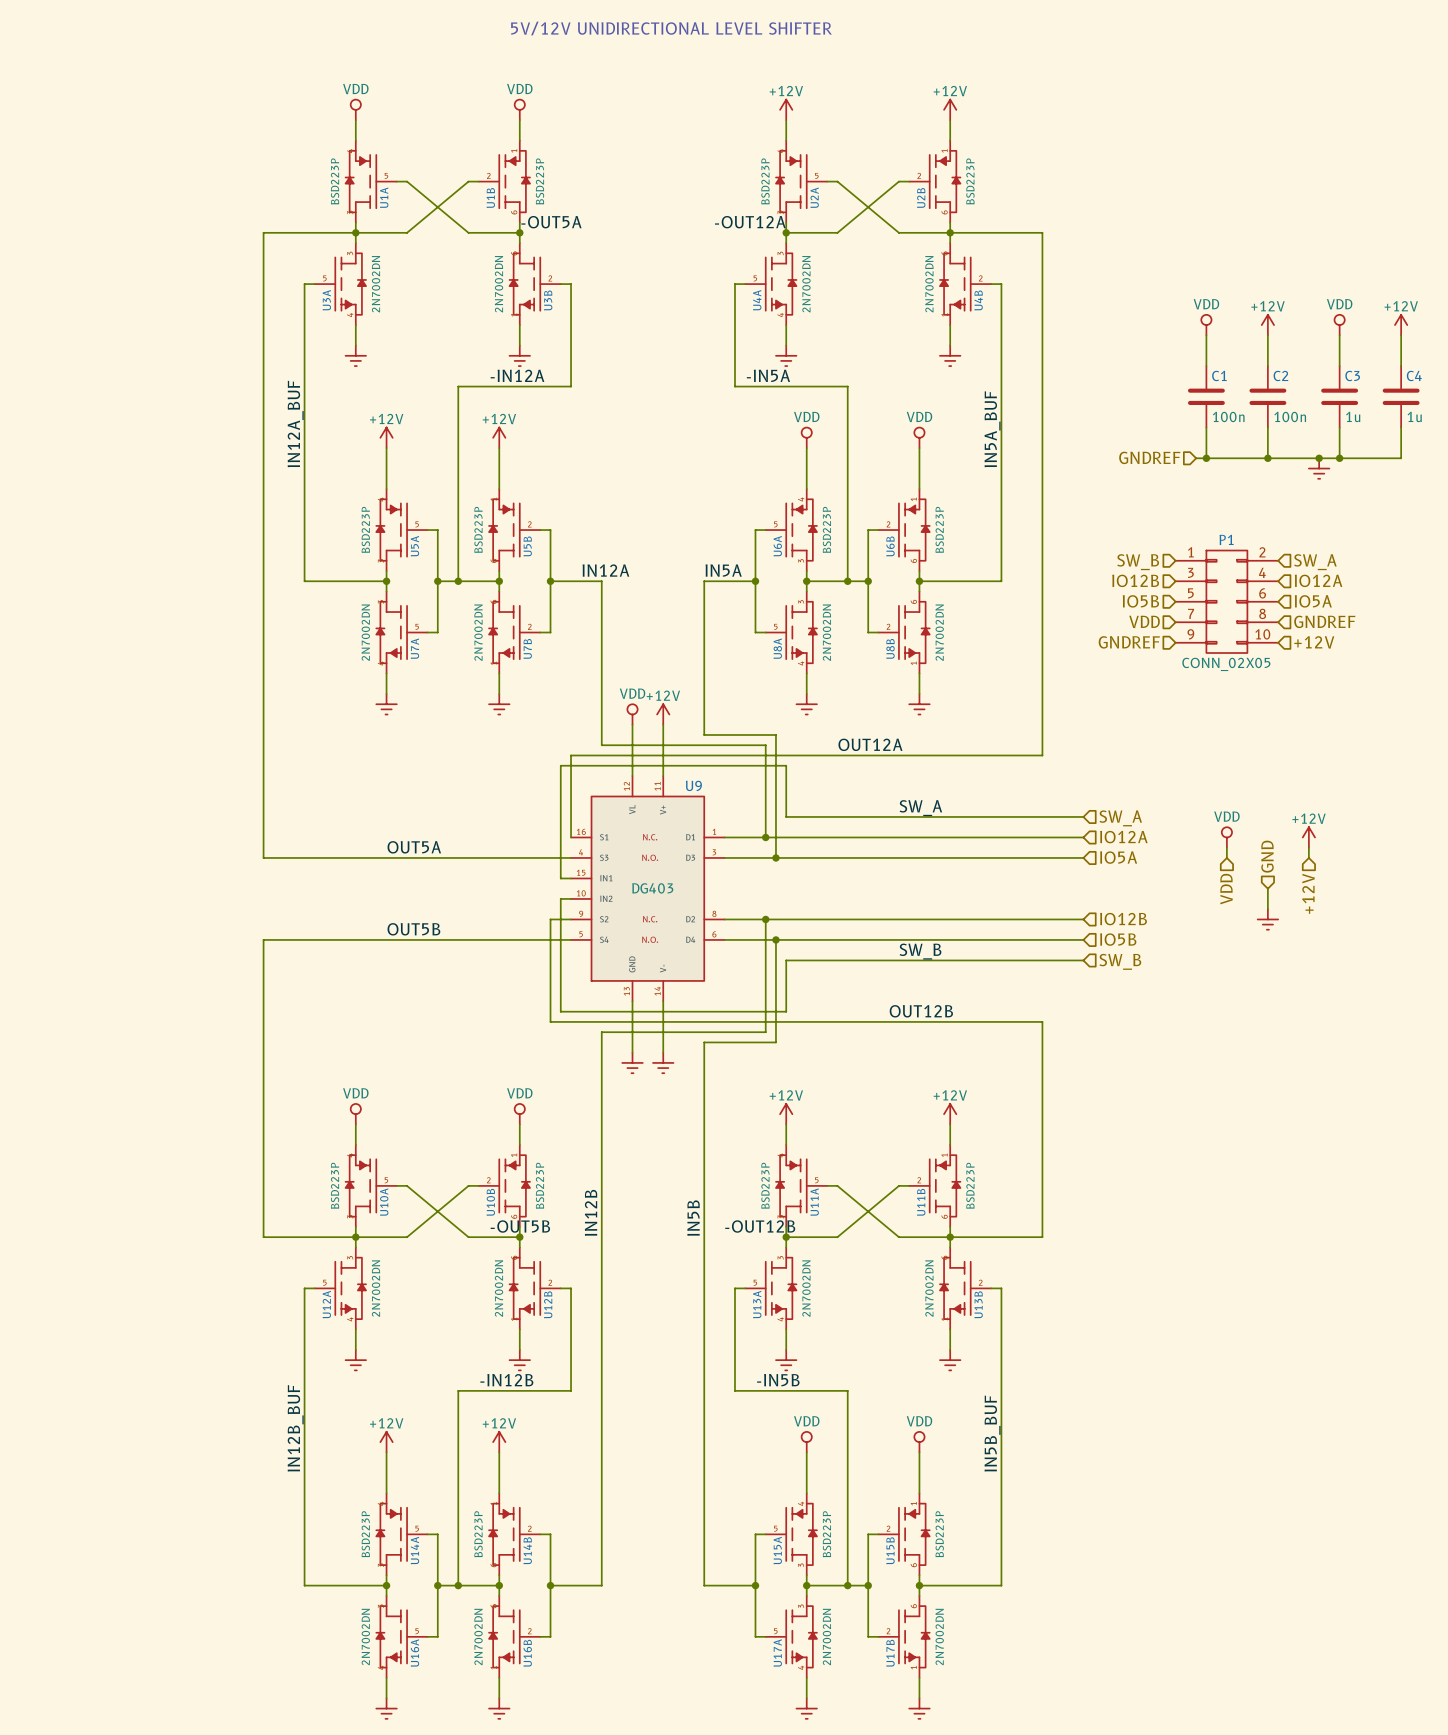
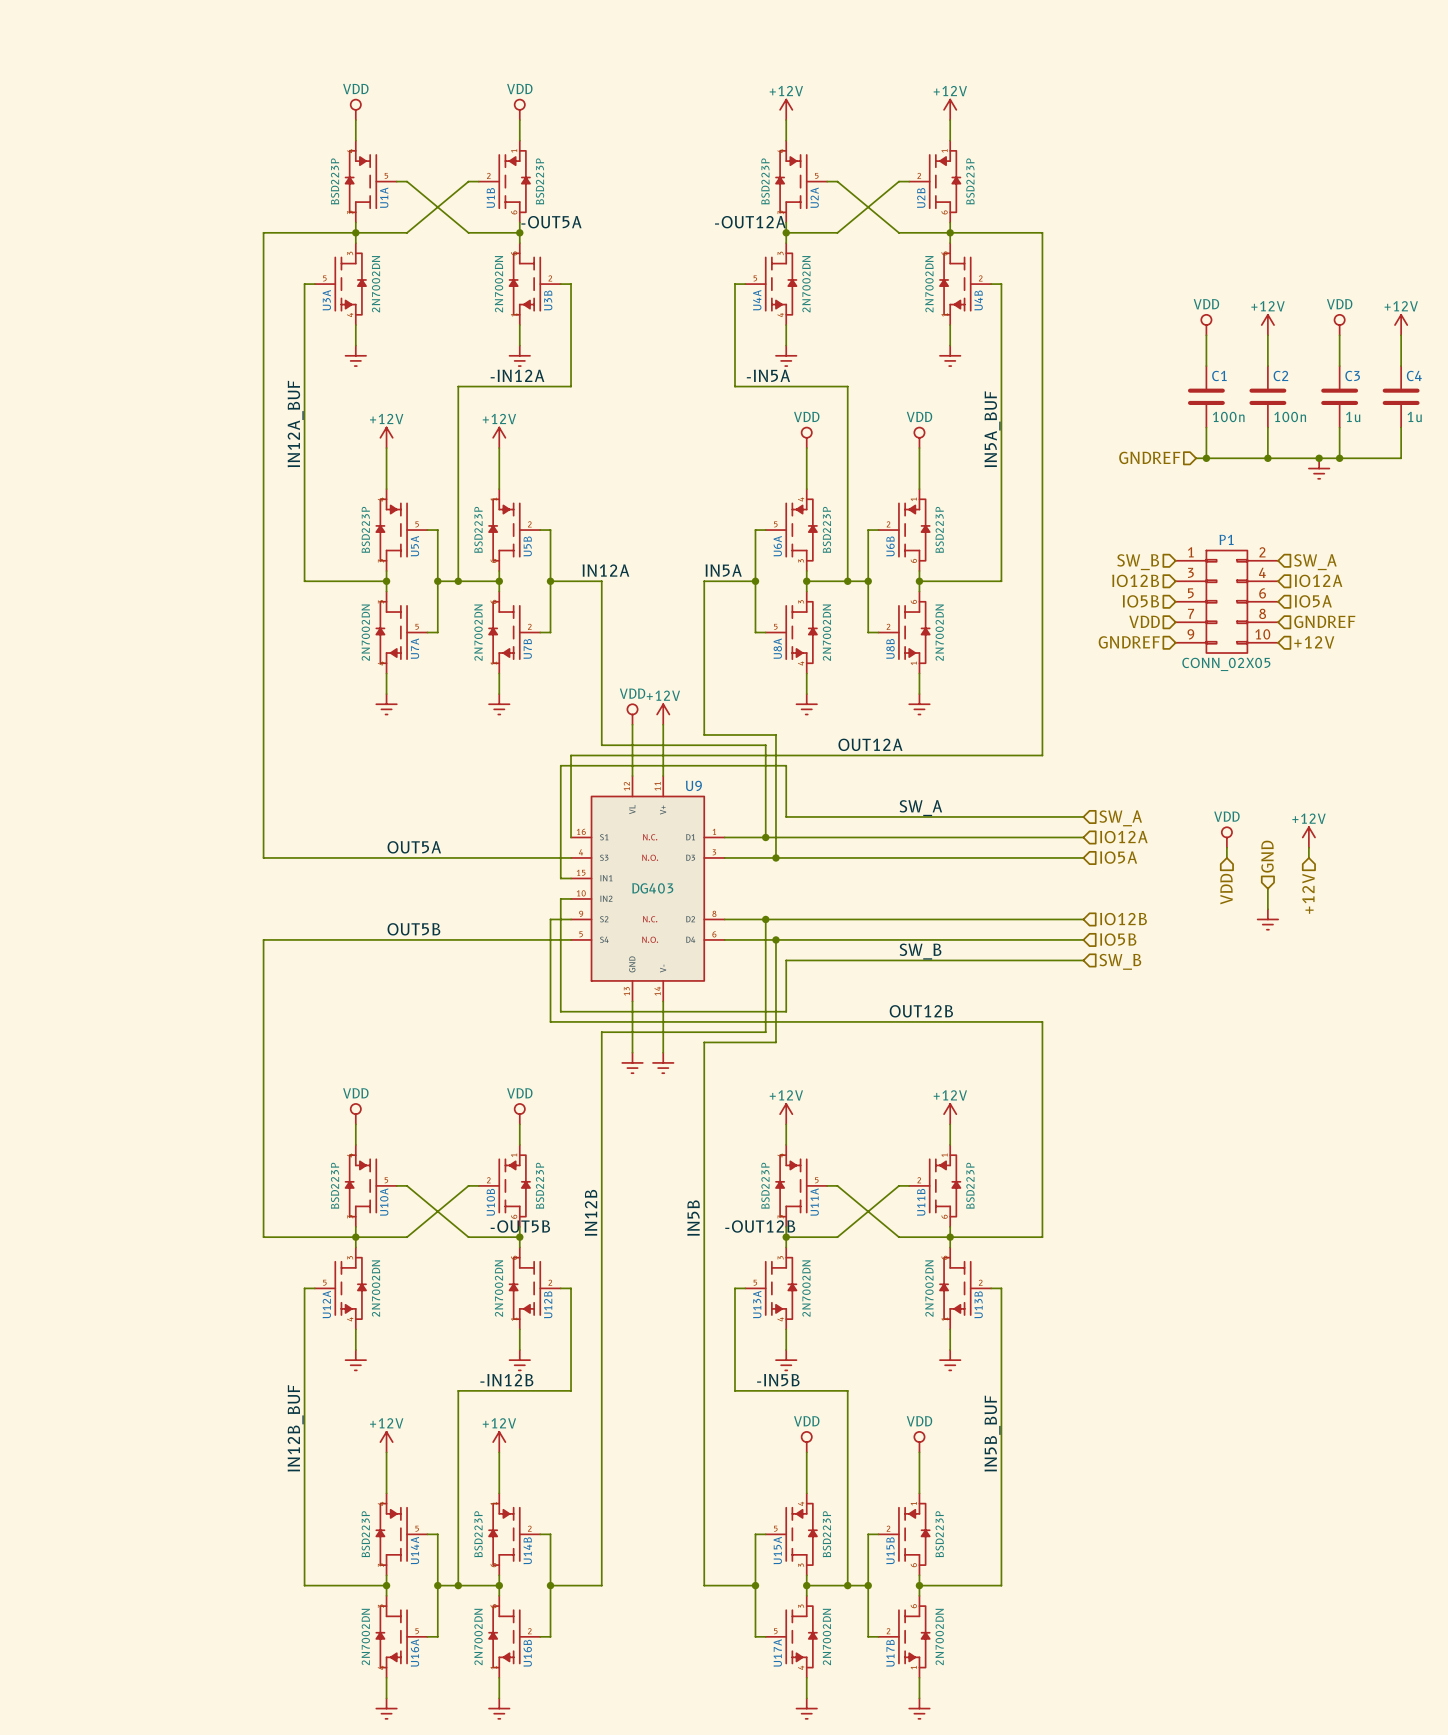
text: 5V/12V UNIDIRECTIONAL LEVEL SHIFTER (671, 28) -> none

